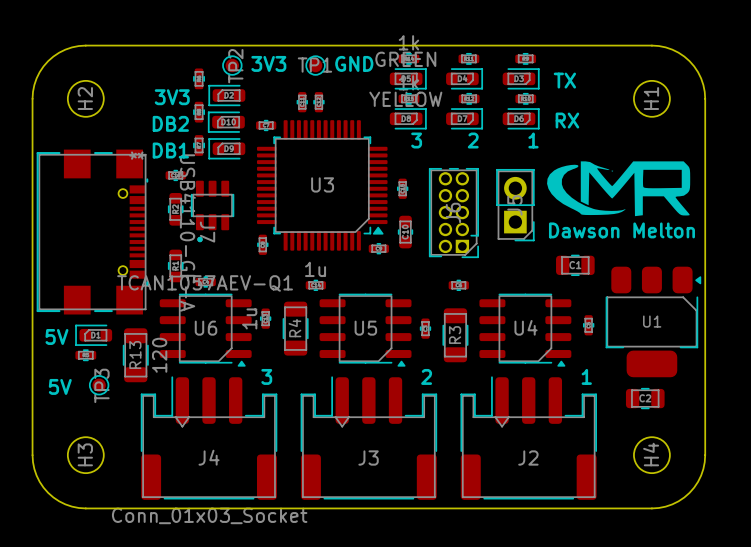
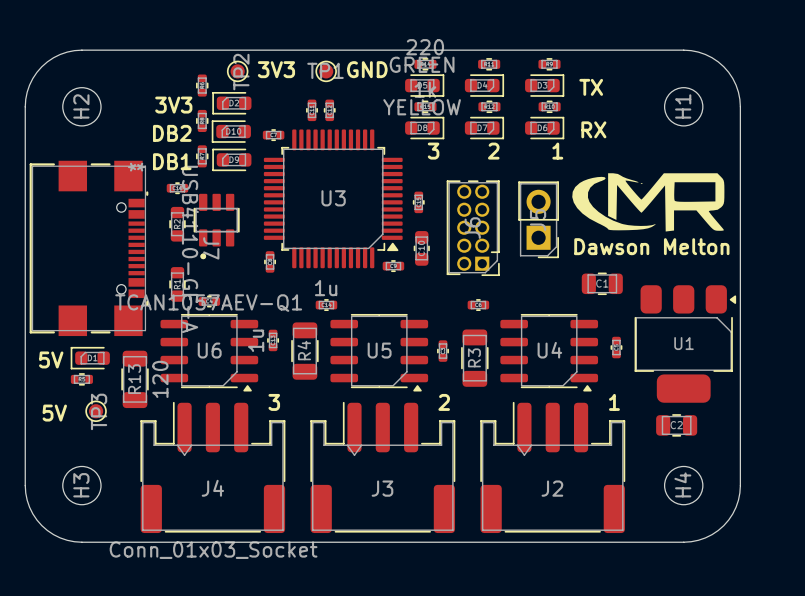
part value: 1k (408, 42) -> 220 (425, 47)

